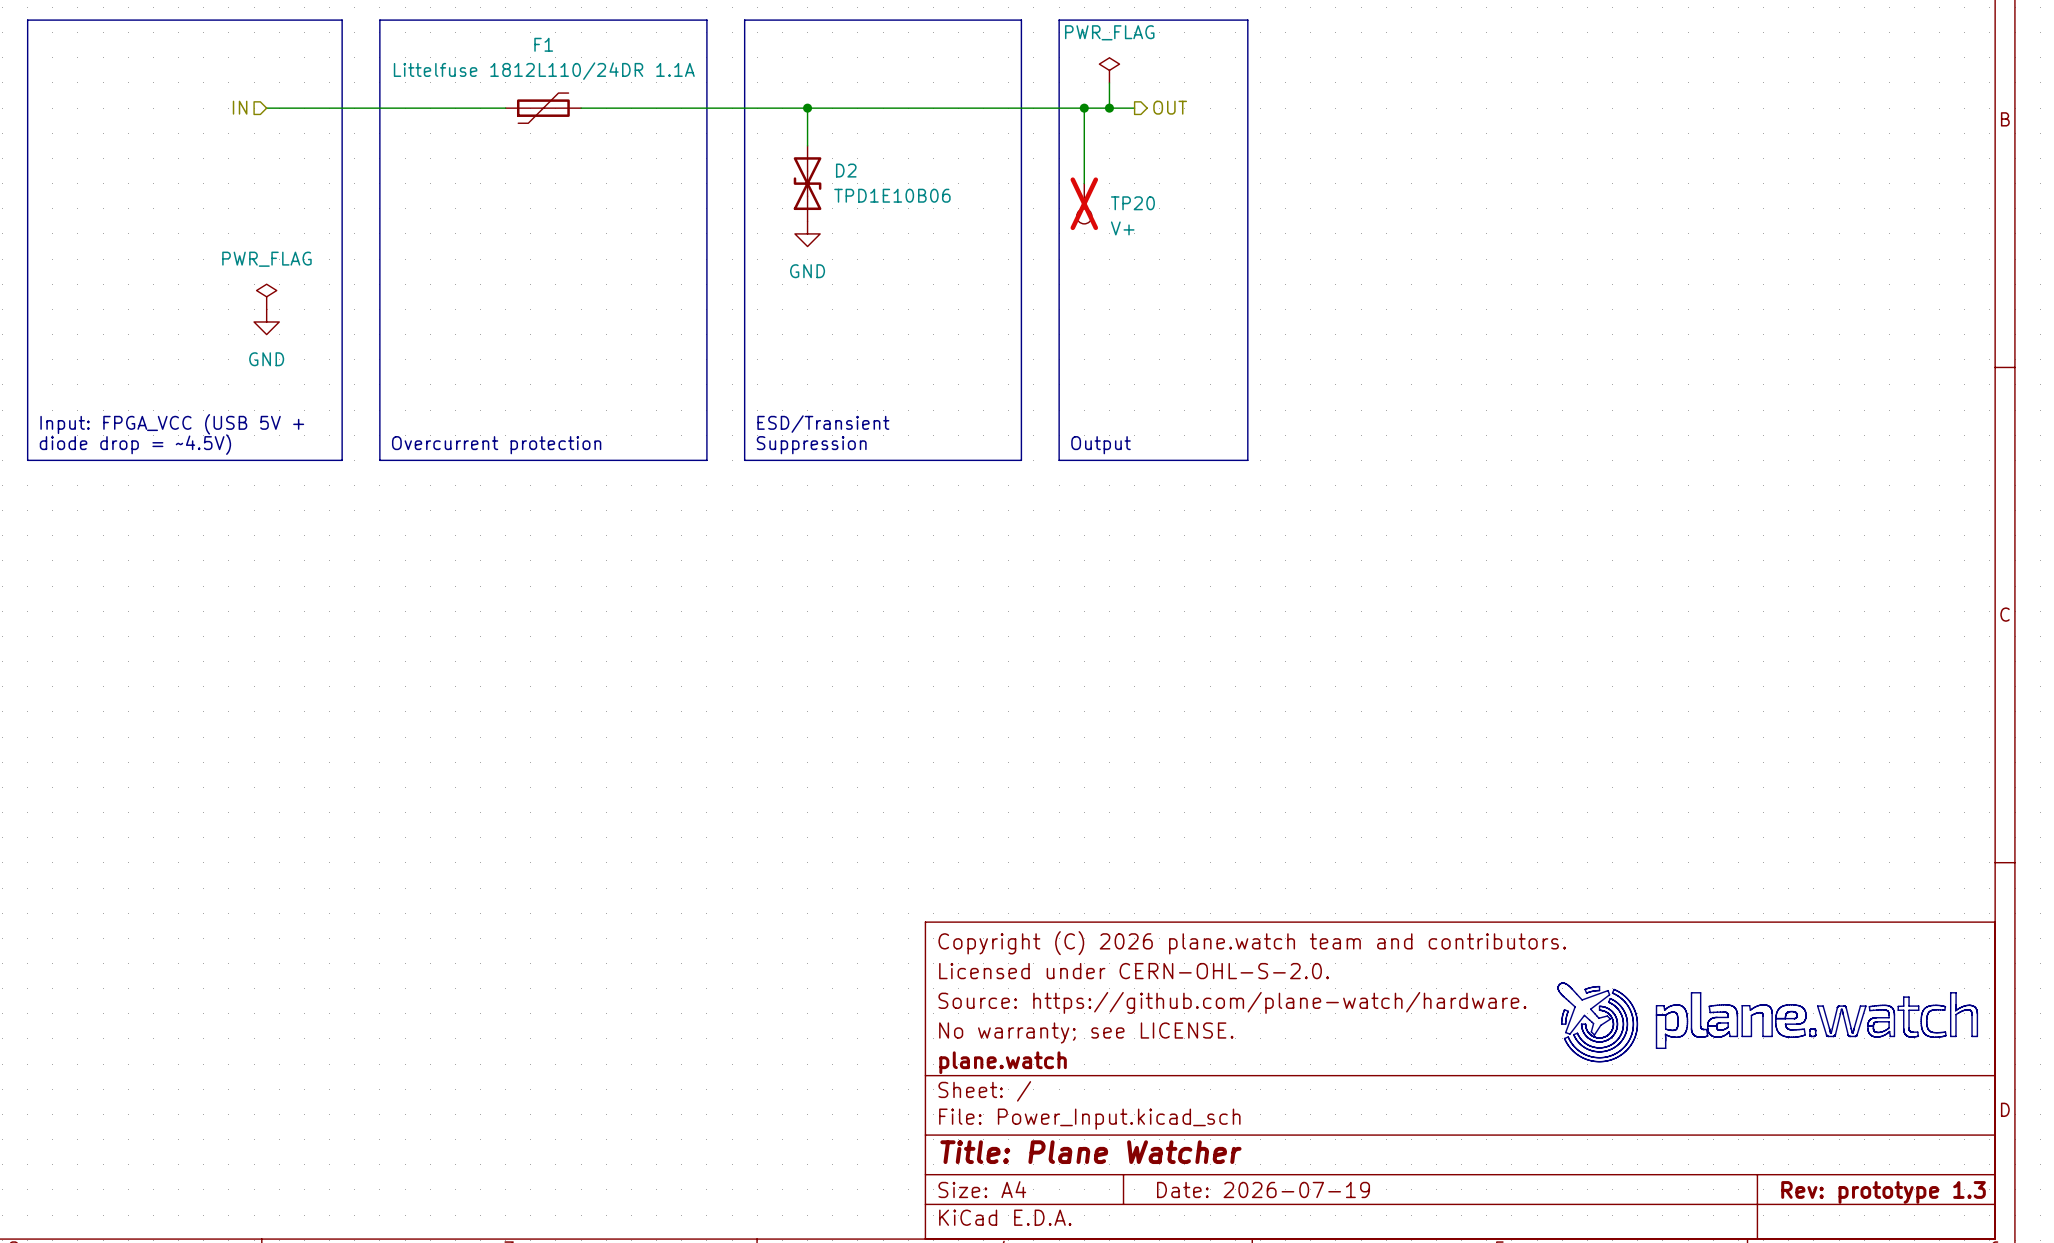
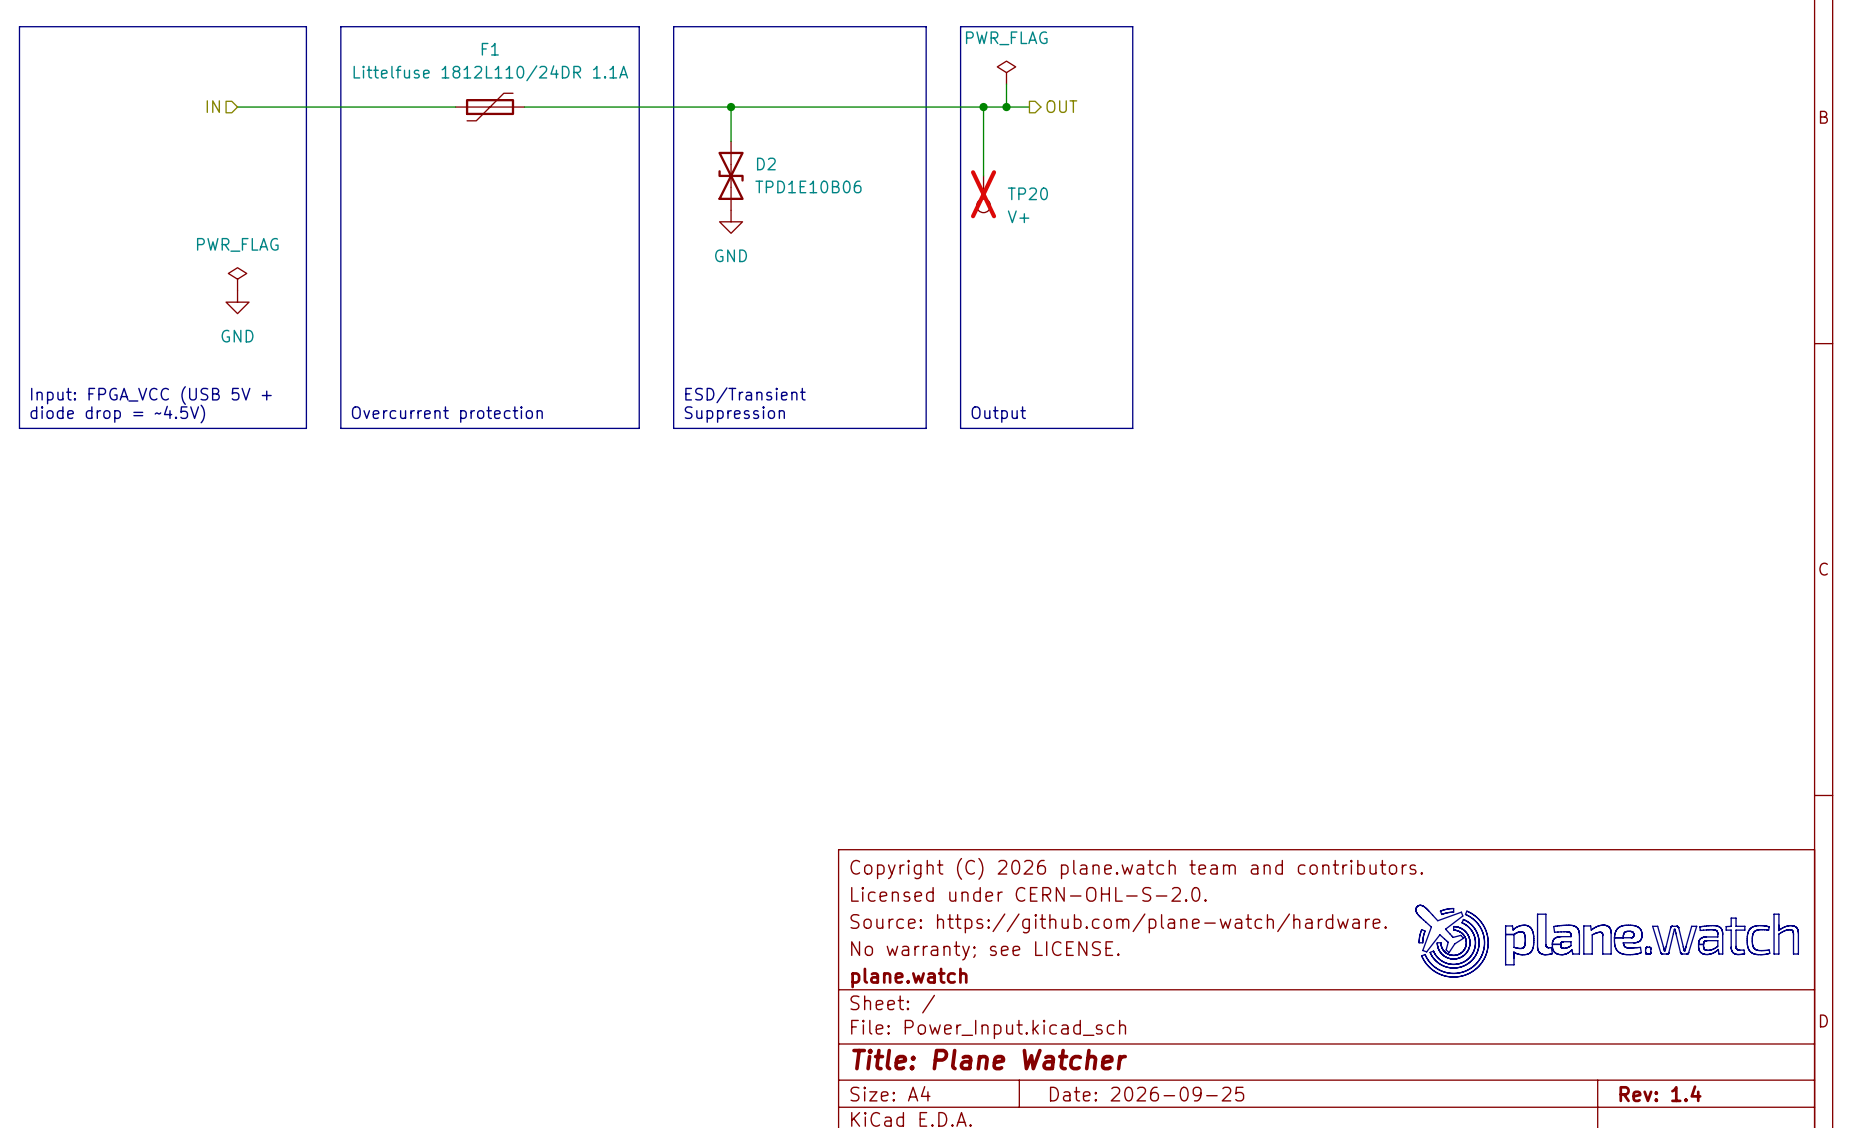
title block: Date: 2026-07-19 (1263, 1189) -> Date: 2026-09-25 (1147, 1094)
title block: Rev: prototype 1.3 (1883, 1192) -> Rev: 1.4 (1660, 1093)

